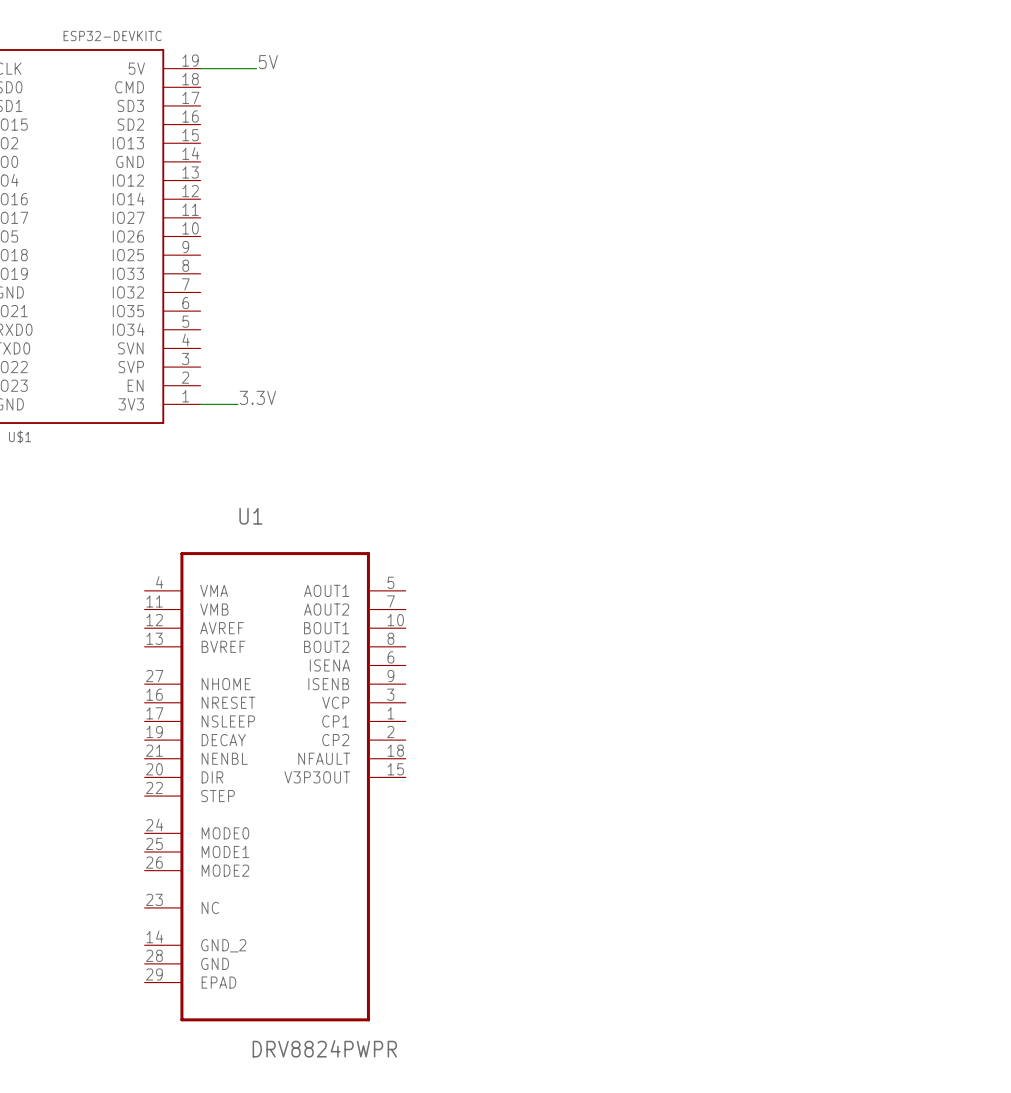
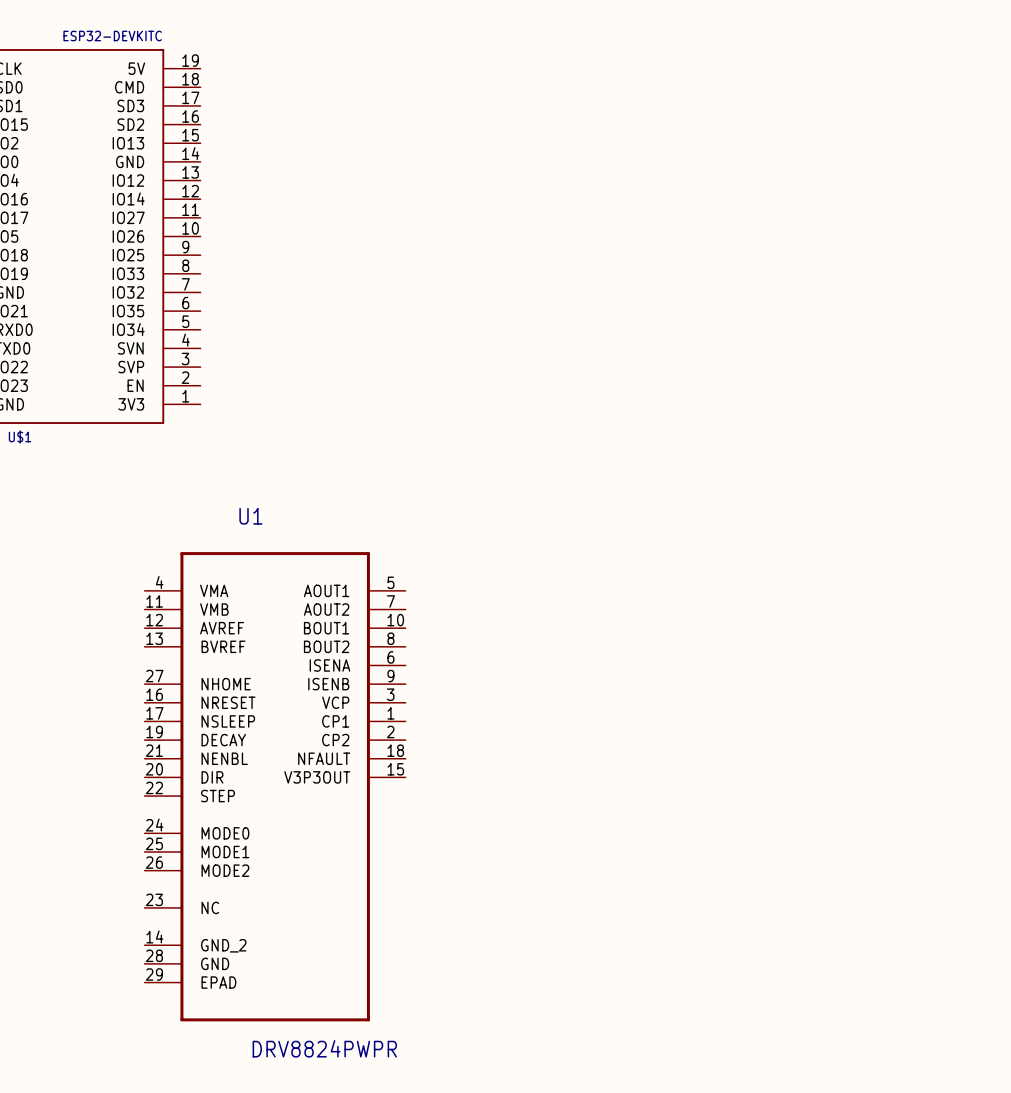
label: 5V (268, 62) -> none
wire: (200, 68) (256, 68) -> none
label: 3.3V (257, 397) -> none
wire: (200, 404) (237, 404) -> none

